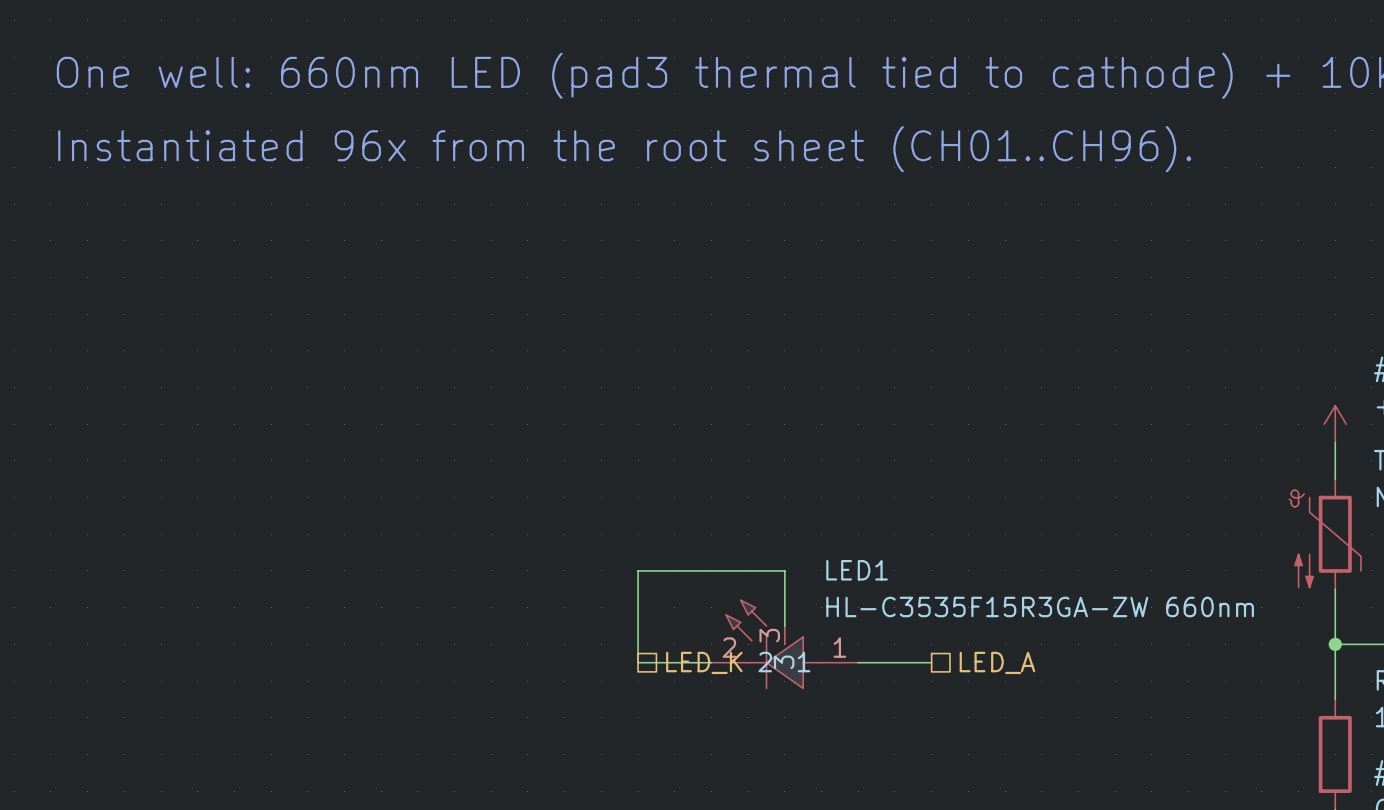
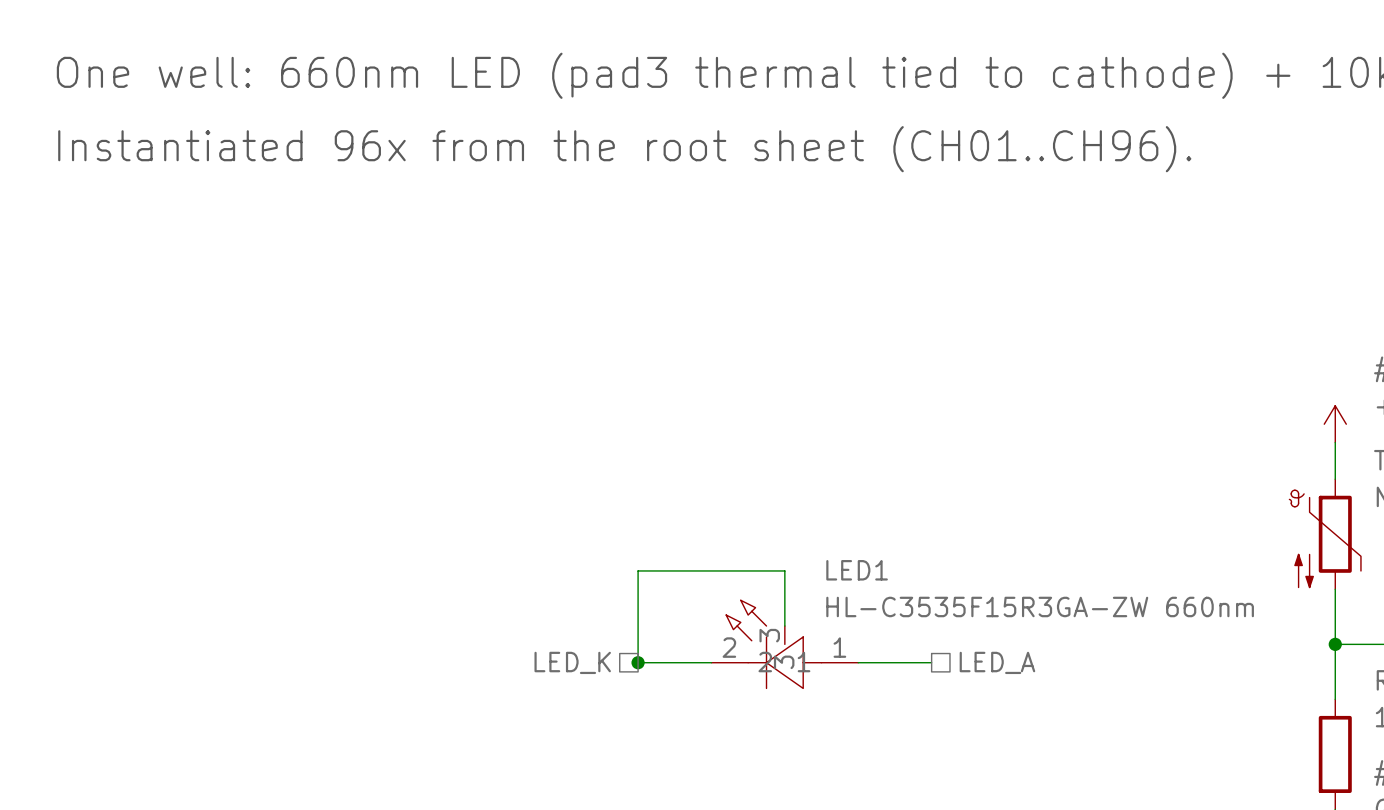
junction: none -> (638, 662)
hierarchical label rotation: 0° (704, 662) -> 180° (572, 662)
hierarchical label position: LED_K (704, 662) -> LED_K (572, 662)

